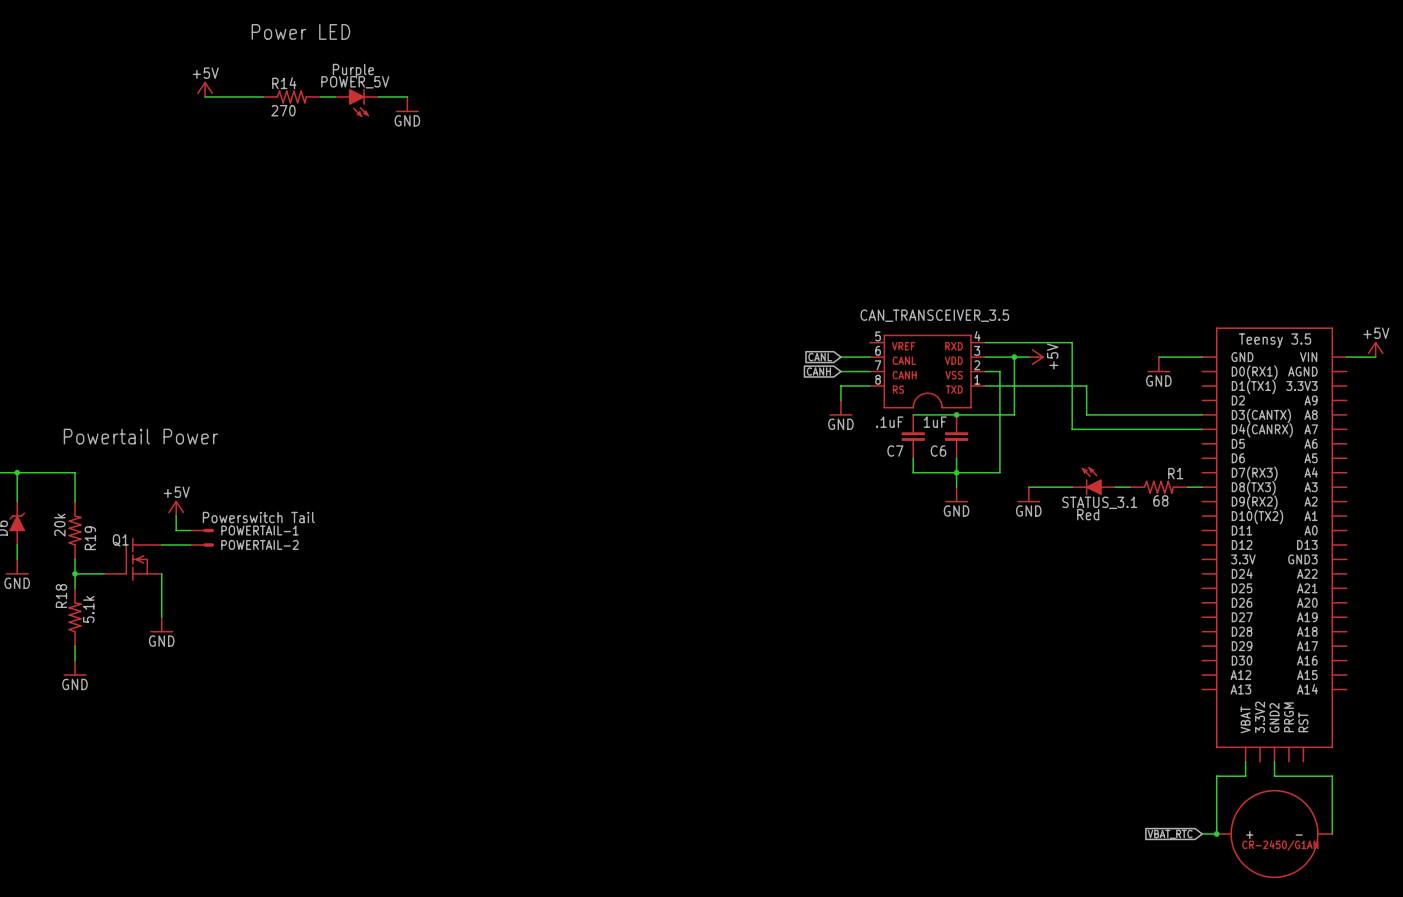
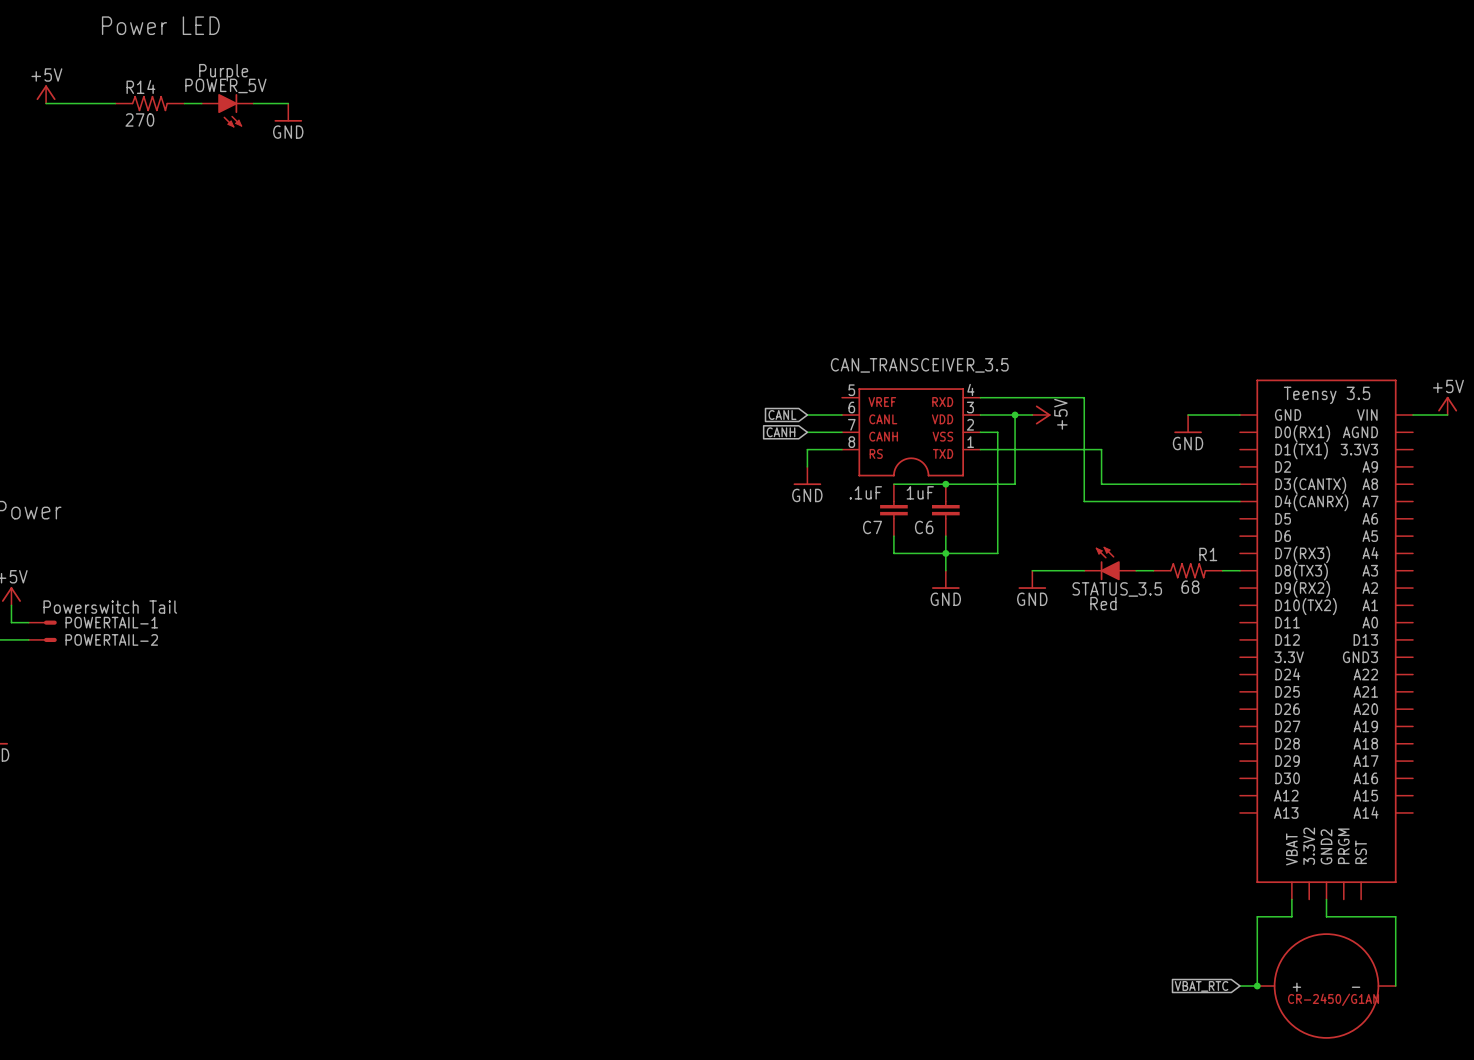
STATUS_3.1 name: STATUS_3.1 (1099, 502) -> STATUS_3.5 (1117, 589)

